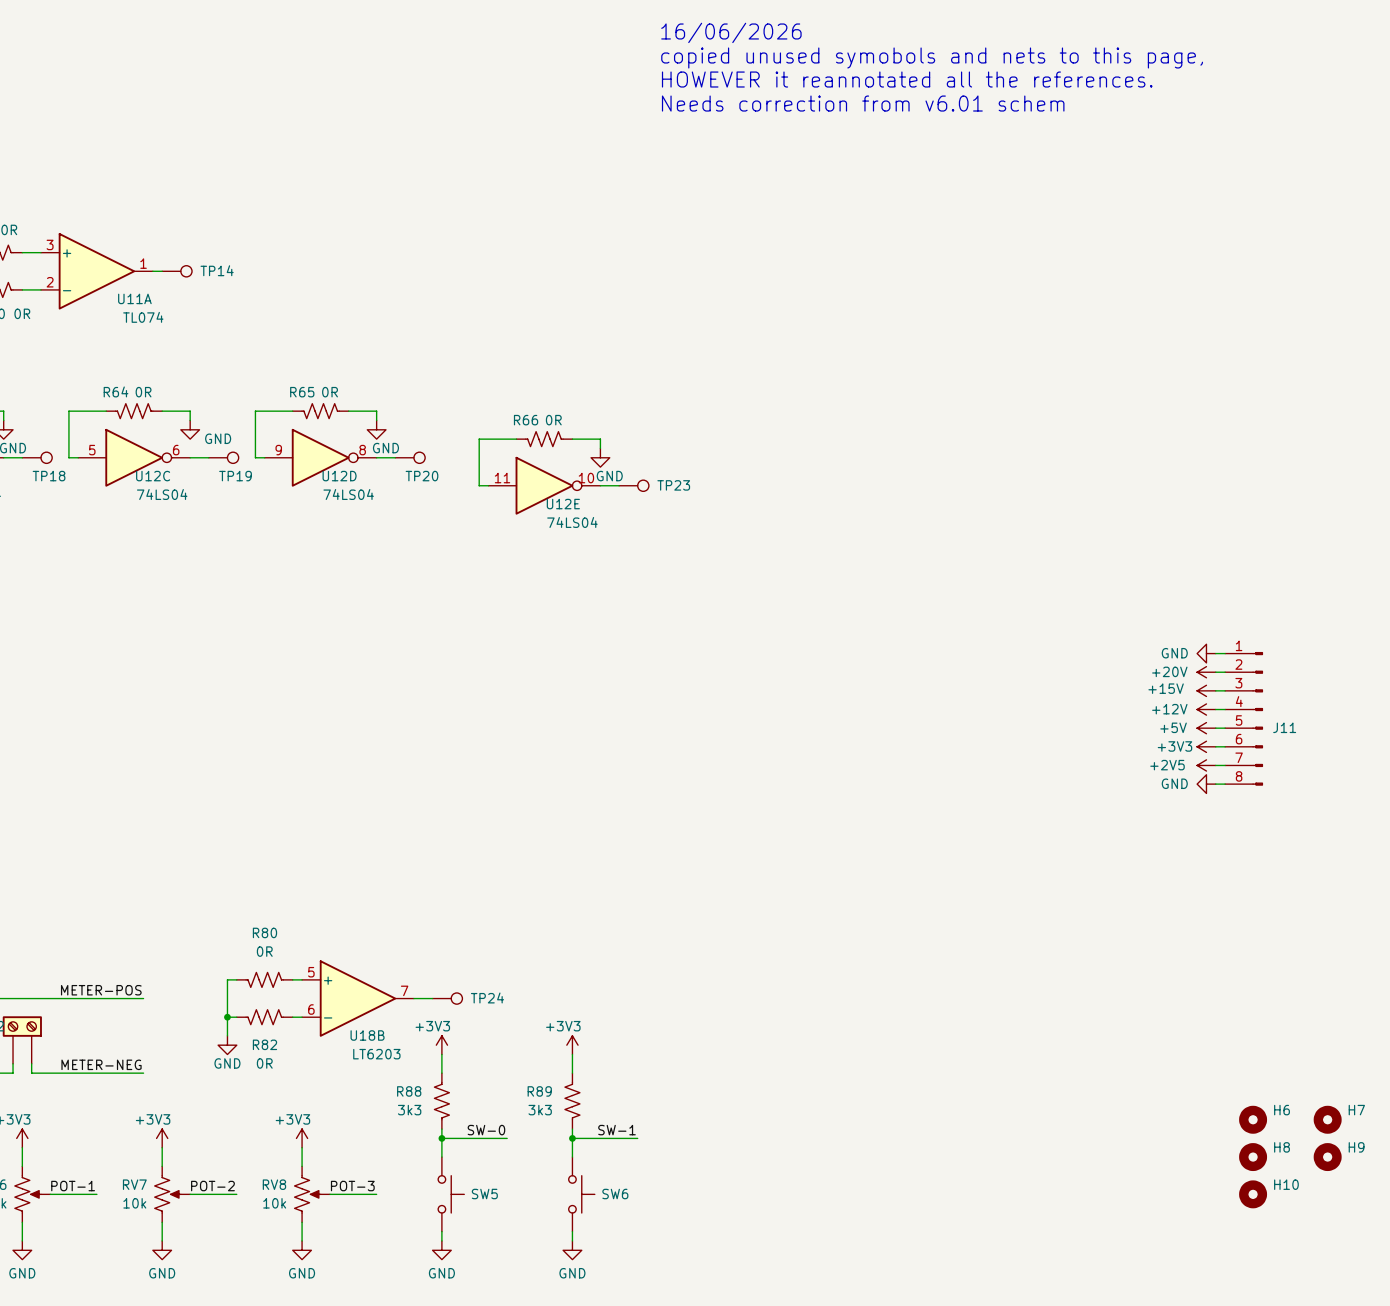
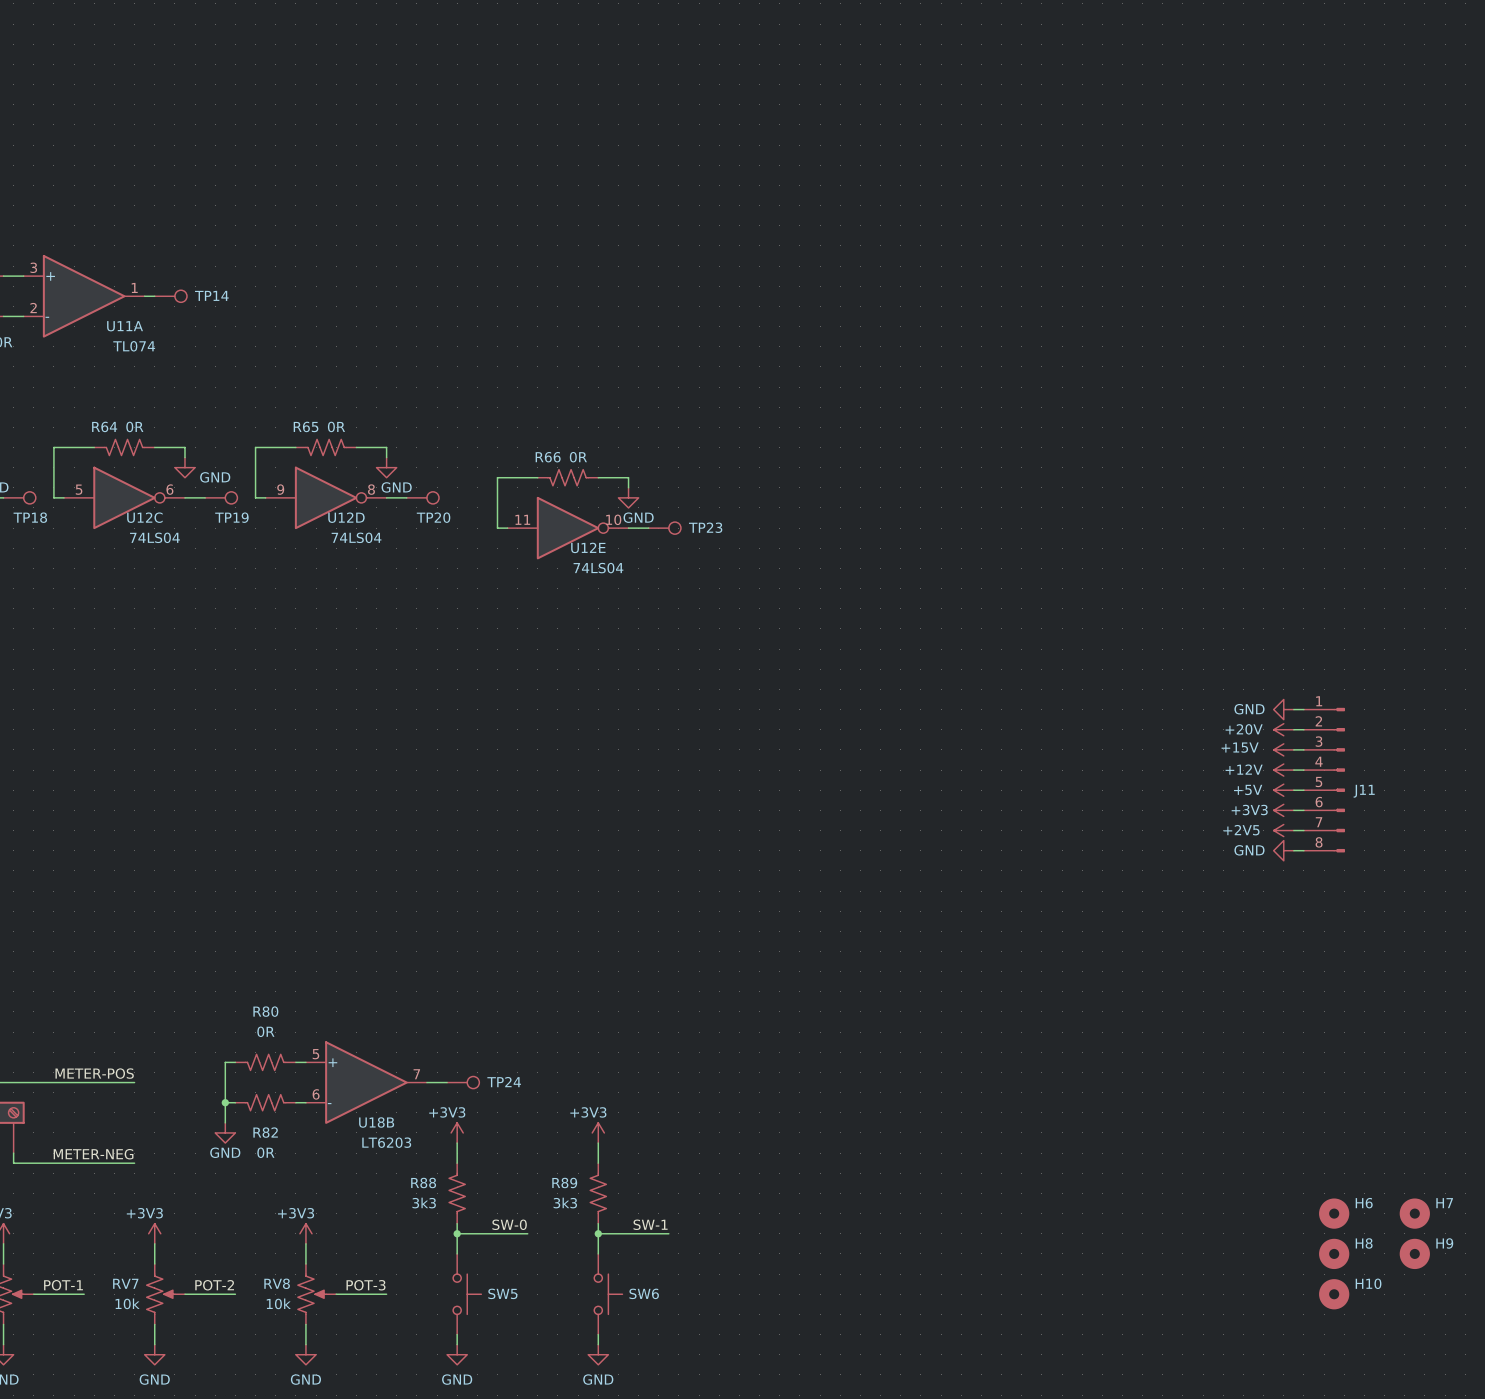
text: 16/06/2026 (731, 32) -> none
text: copied unused symobols and nets to this page, (932, 57) -> none
text: HOWEVER it reannotated all the references. (907, 79) -> none
text: Needs correction from v6.01 schem (863, 103) -> none

